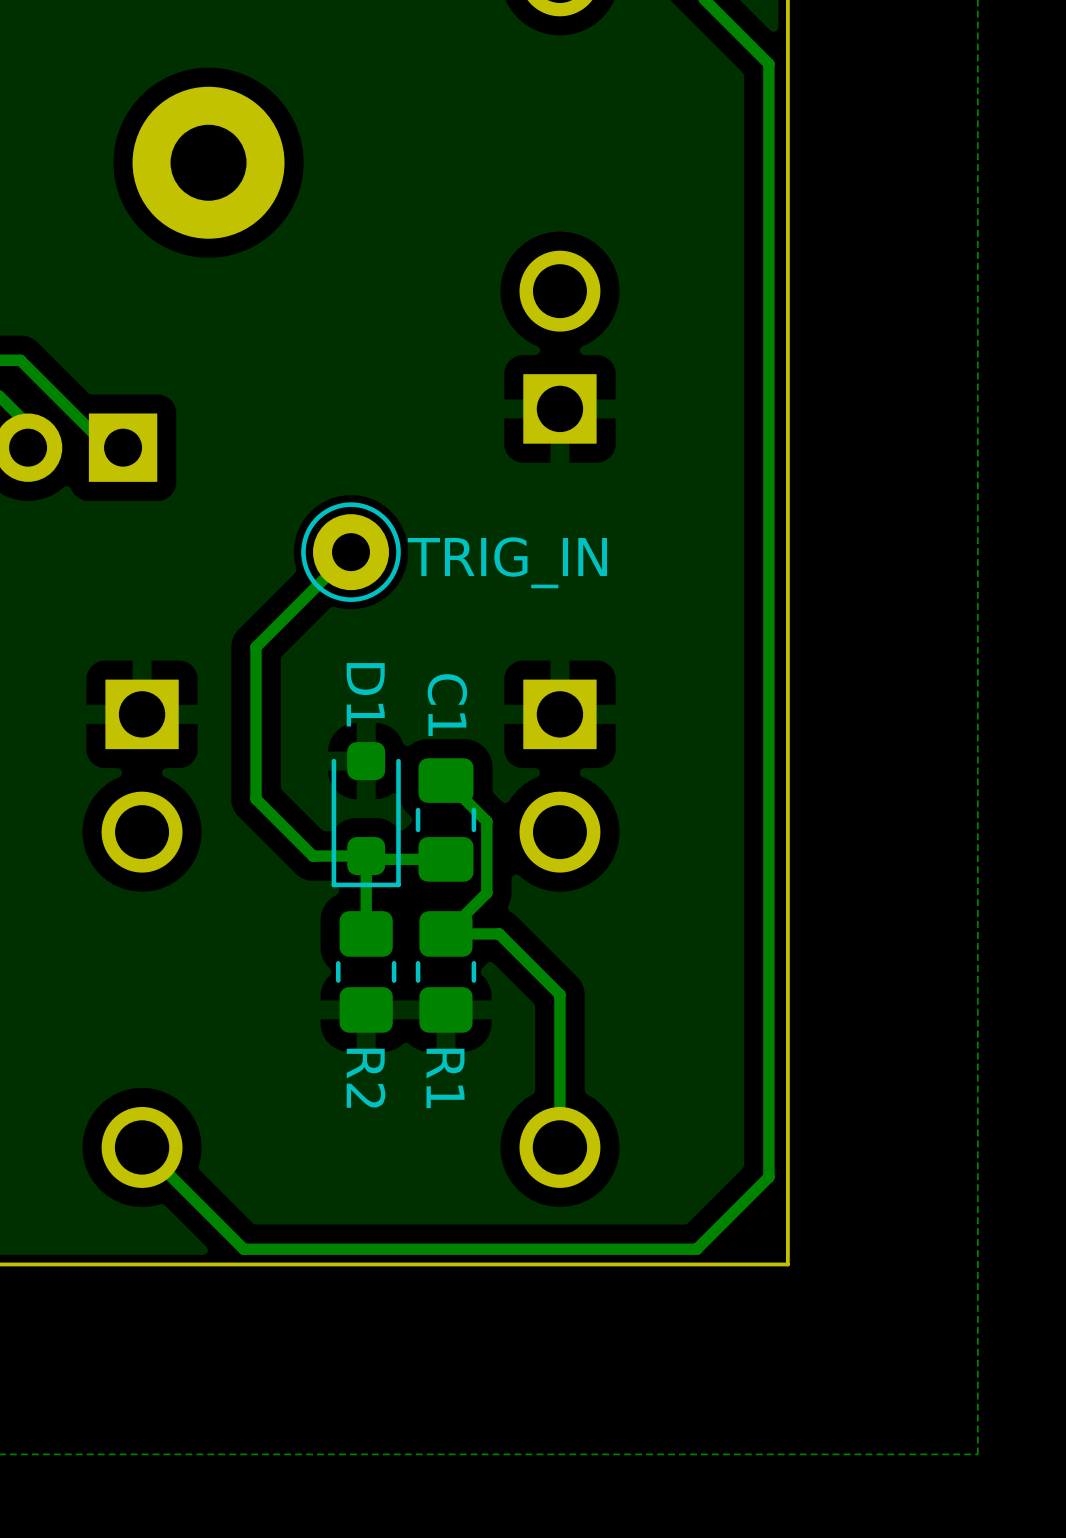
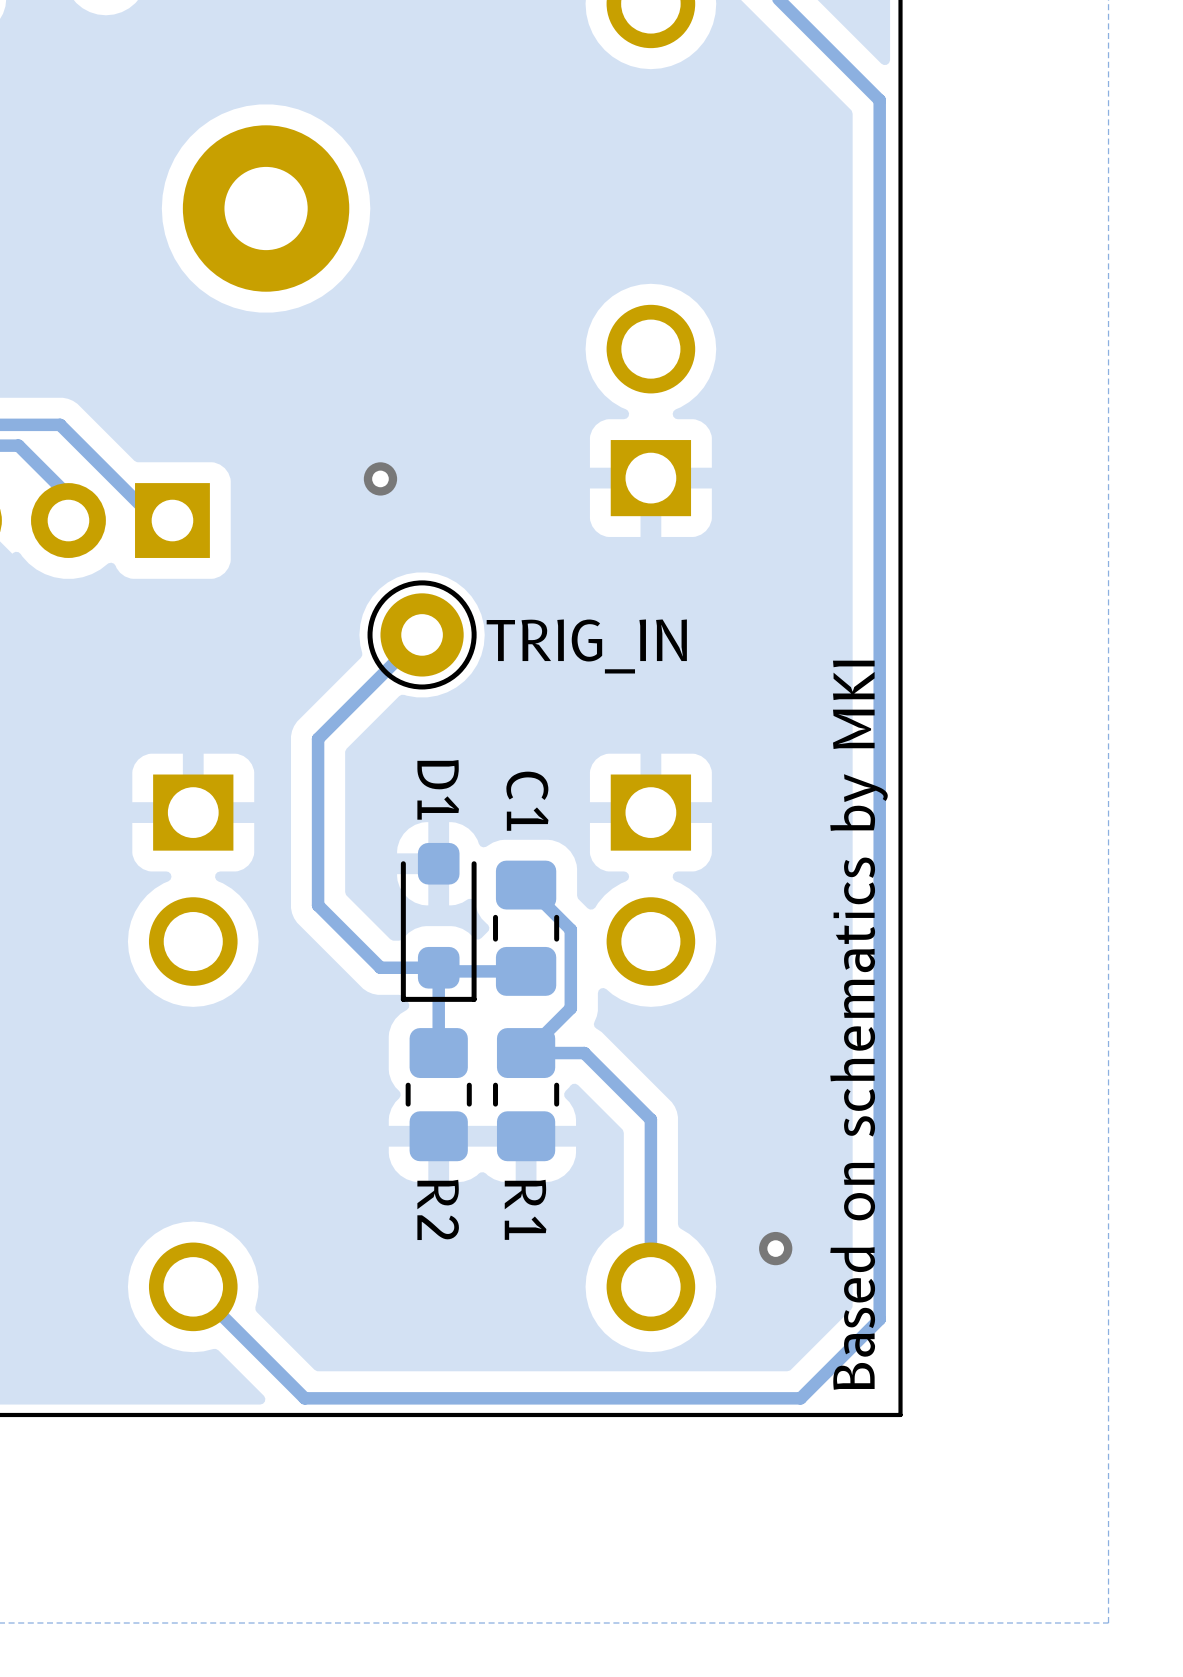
via: none -> (380, 478)
text: none -> Based on schematics by MKI (859, 1025)
via: none -> (775, 1248)

